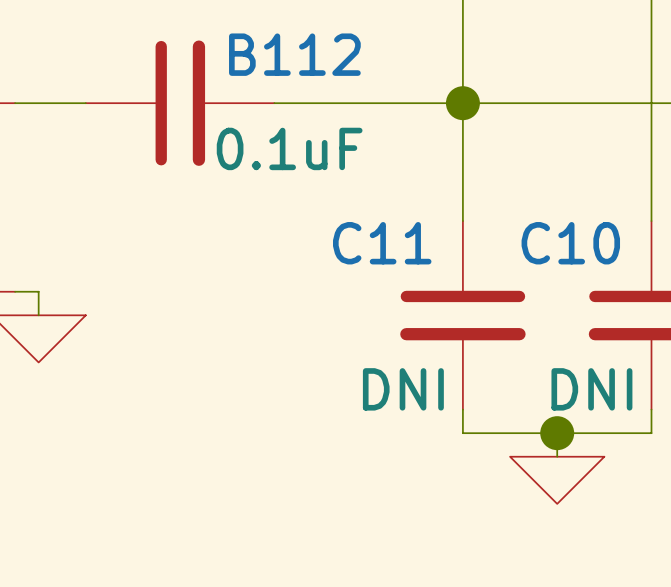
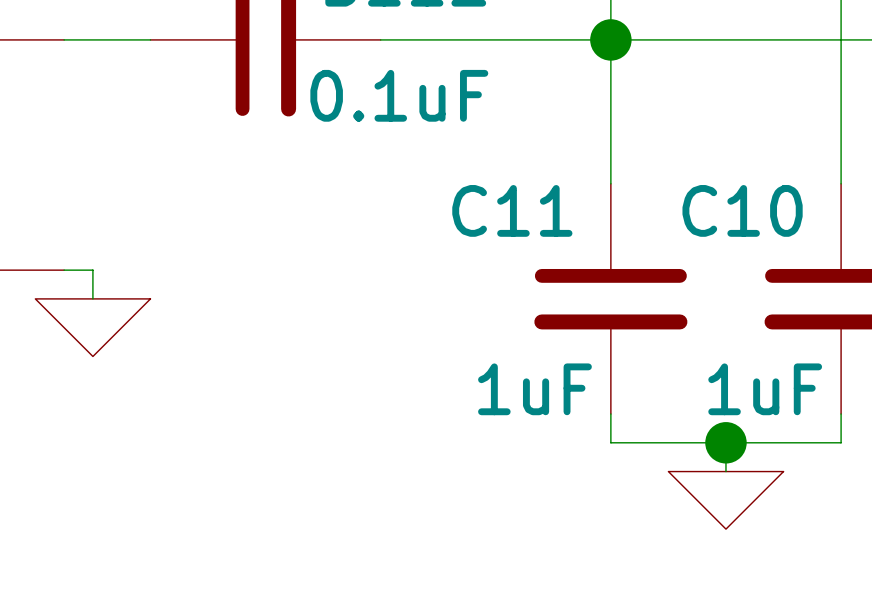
C11 value: DNI (403, 389) -> 1uF (534, 389)
C10 value: DNI (591, 389) -> 1uF (765, 389)

